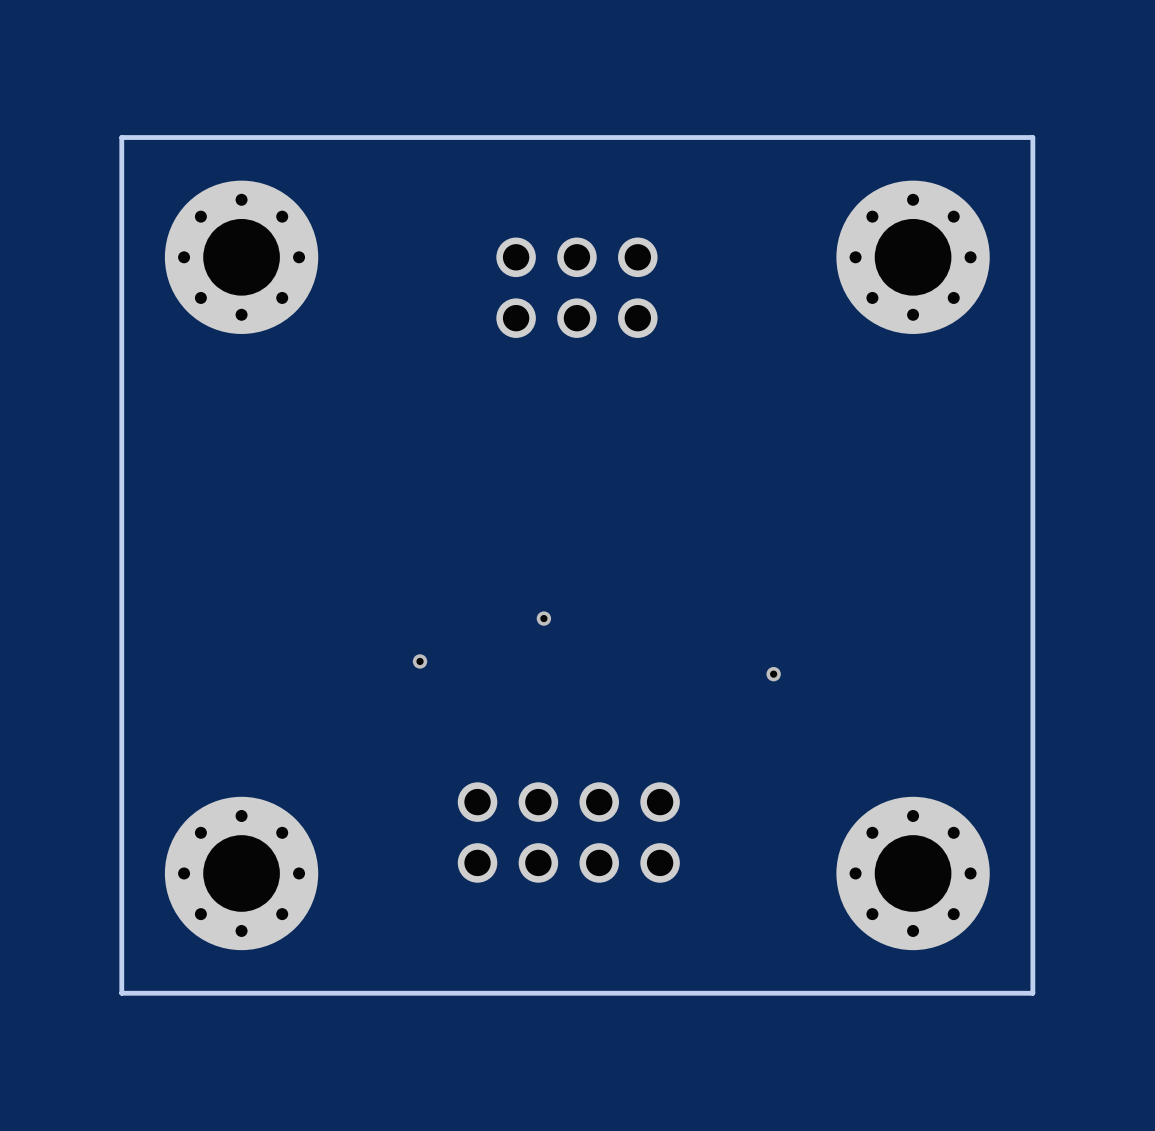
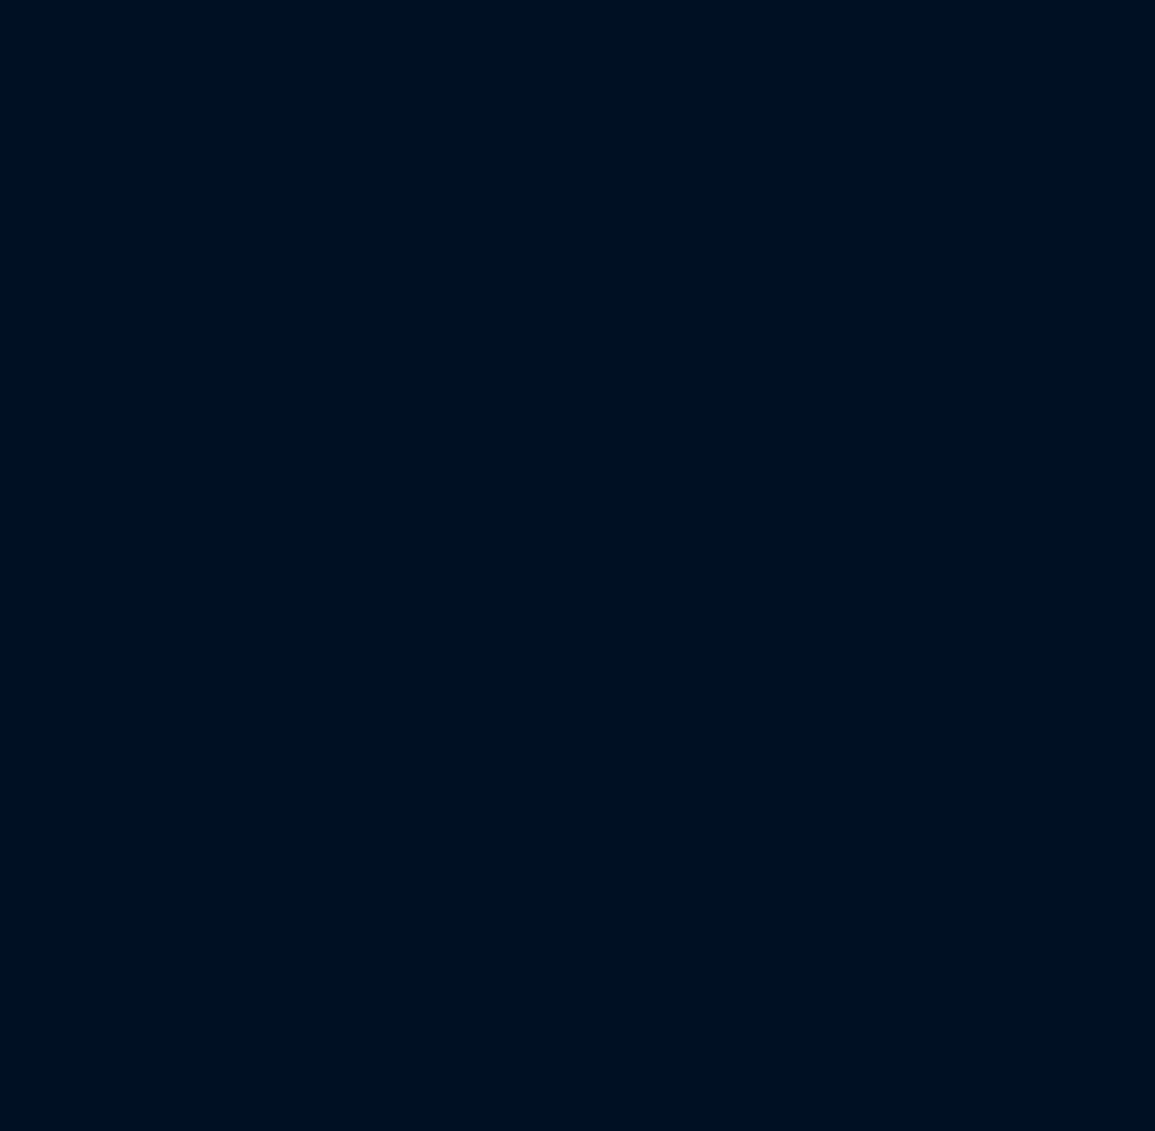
board edge: (1032, 137) (121, 137) (121, 993) (1032, 993) (1032, 137) -> none
part: (241, 257) -> none
part: (913, 257) -> none
part: (576, 287) -> none
via: (543, 618) -> none
via: (420, 661) -> none
via: (773, 674) -> none
part: (568, 832) -> none
part: (241, 873) -> none
part: (913, 873) -> none

